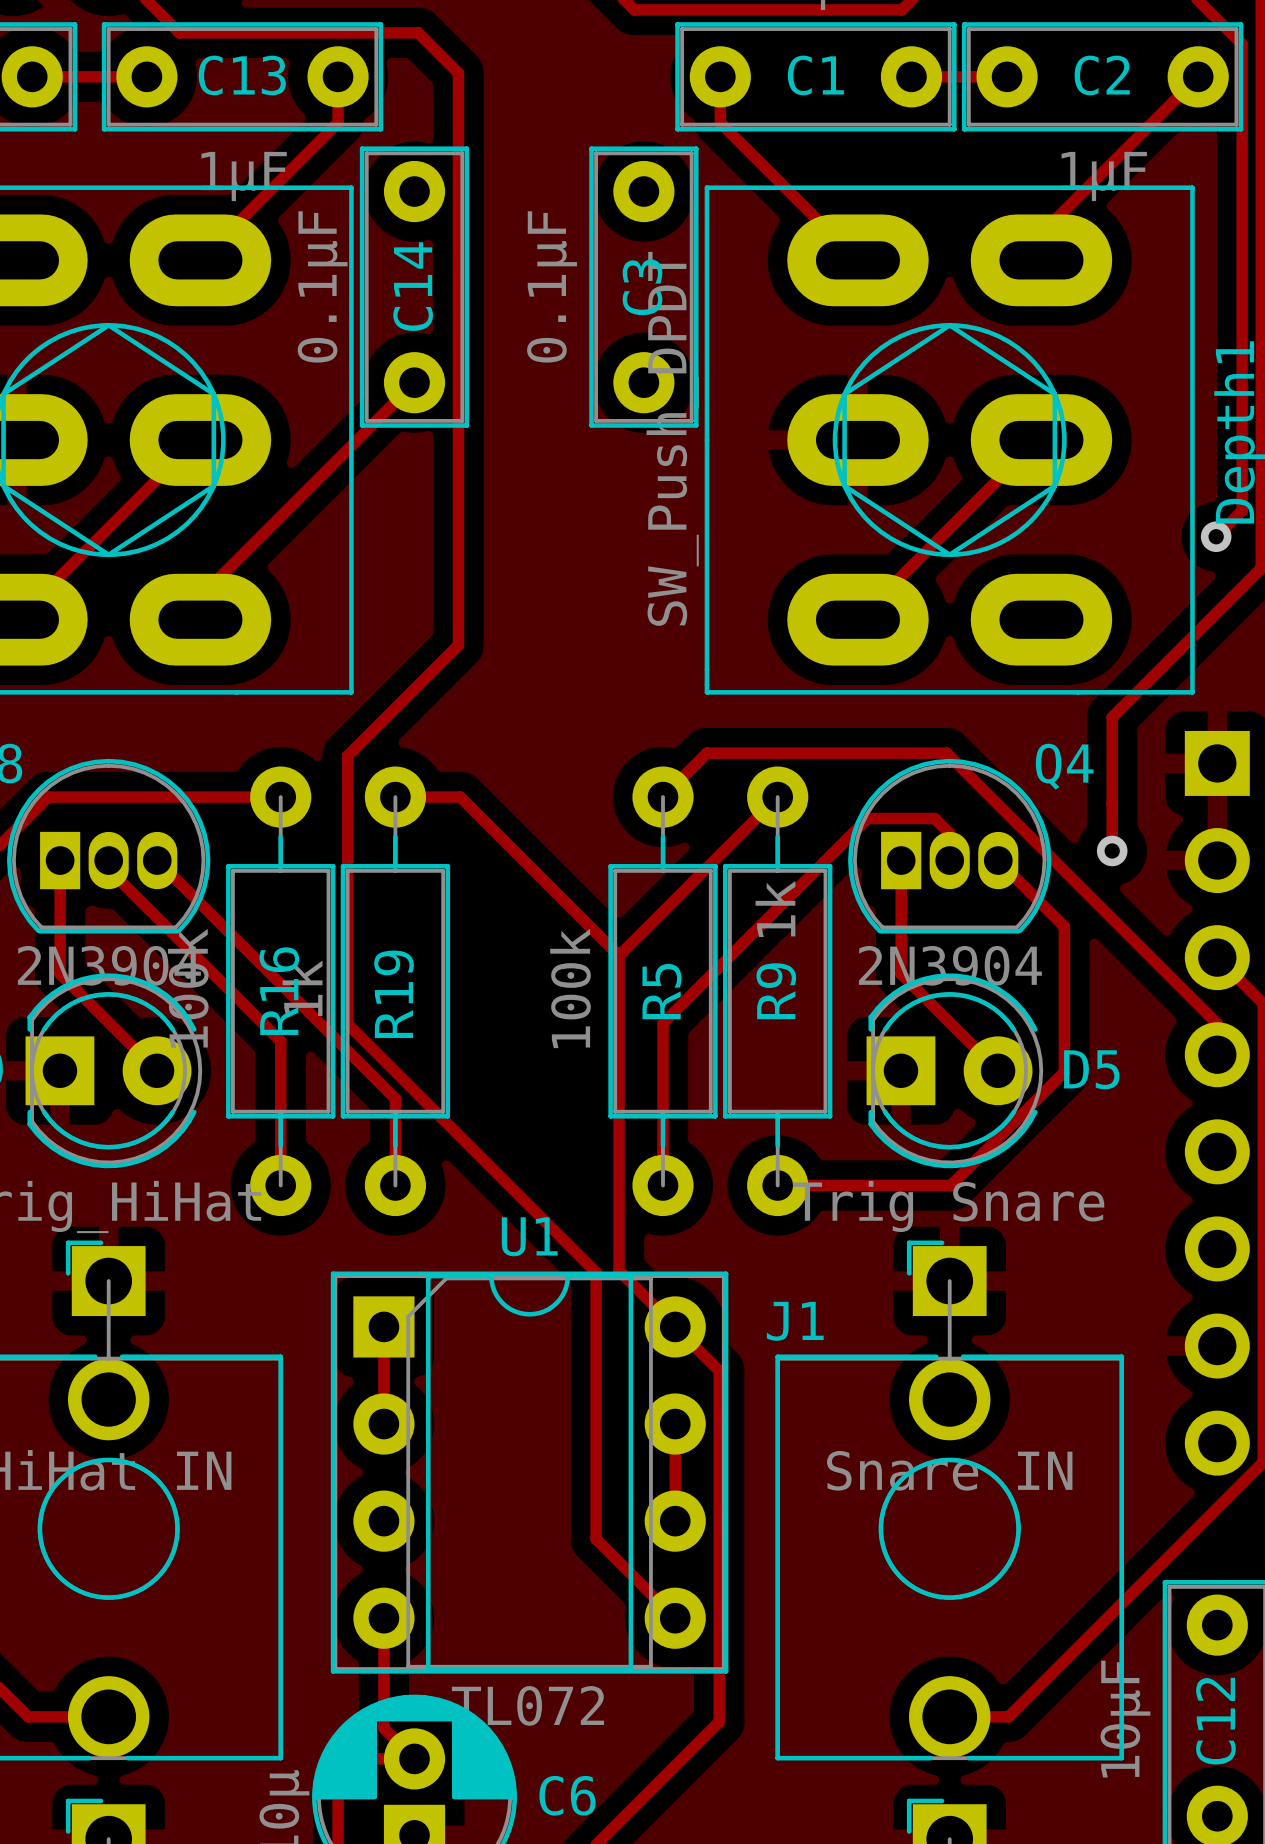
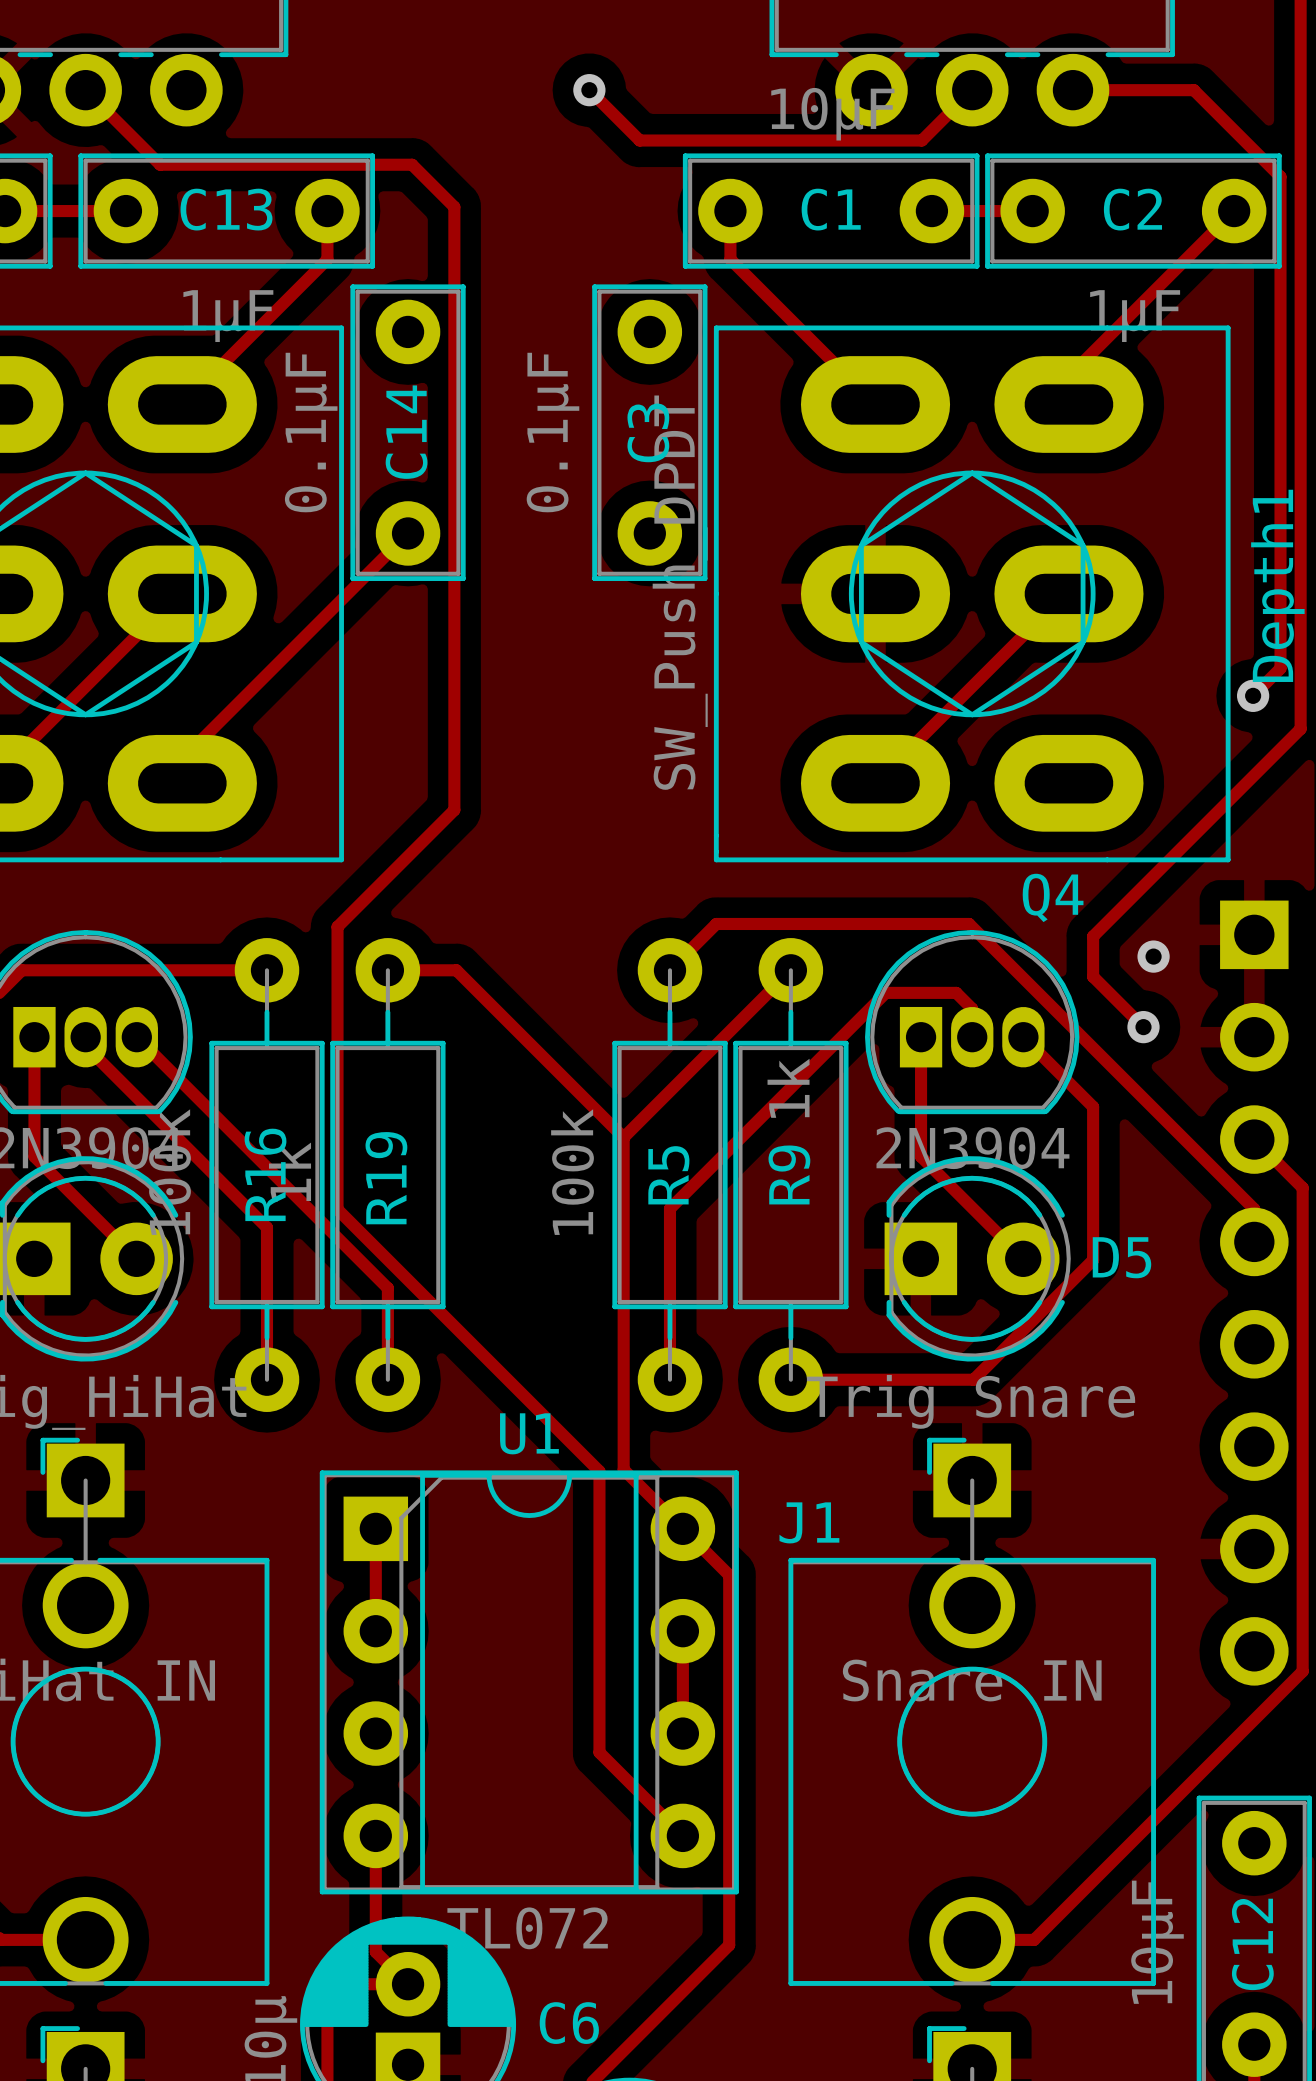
track: (1112, 717) (1112, 850) -> (1143, 886) (1093, 936) (1093, 976) (1143, 1027)
Q4 name position: Q4 (1064, 766) -> Q4 (1053, 897)
via: none -> (1153, 956)

